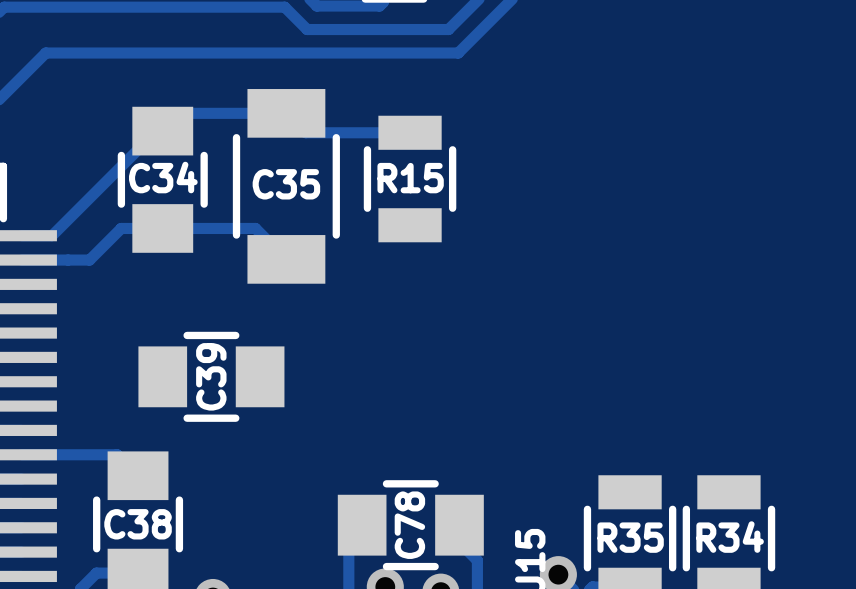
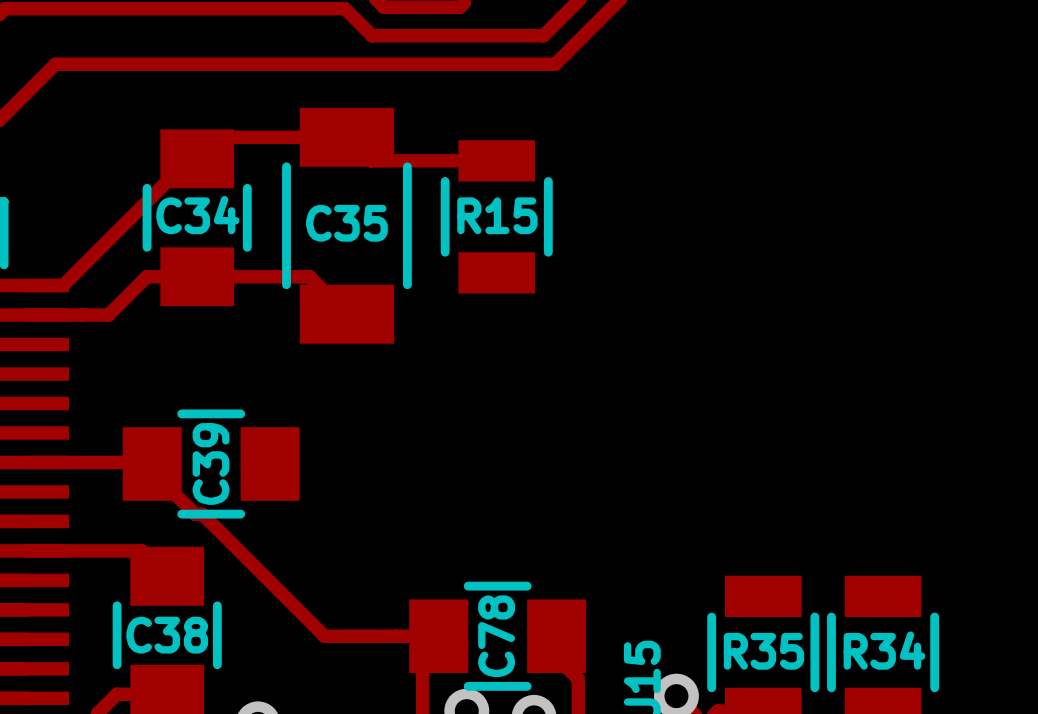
C39 position: (211, 376) -> (211, 464)
track: none -> (26, 462) (150, 462) (152, 471) (195, 514) (202, 514) (324, 636) (438, 636)

